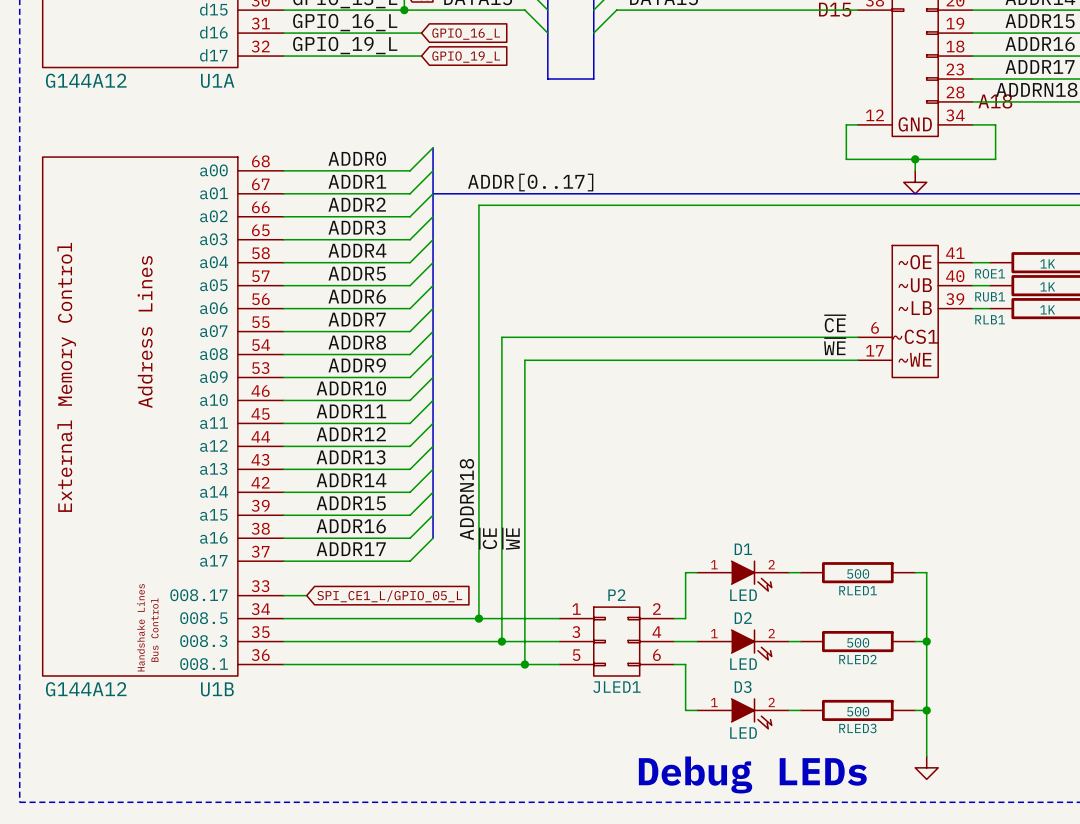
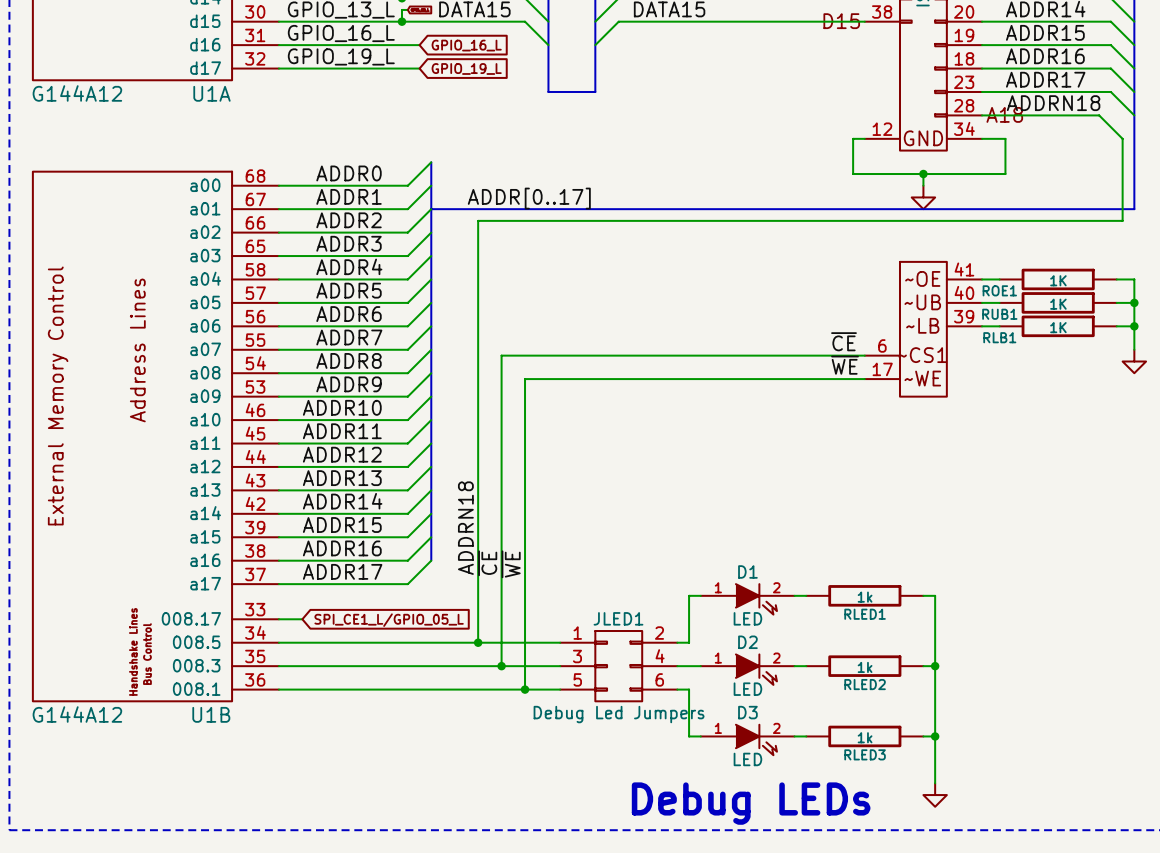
RLED1 value: 500 (858, 573) -> 1k (865, 597)
P2 name: P2 (616, 595) -> JLED1 (618, 618)
RLED2 value: 500 (858, 642) -> 1k (865, 667)
P2 value: JLED1 (616, 687) -> Debug Led Jumpers (619, 714)
RLED3 value: 500 (858, 711) -> 1k (865, 737)

